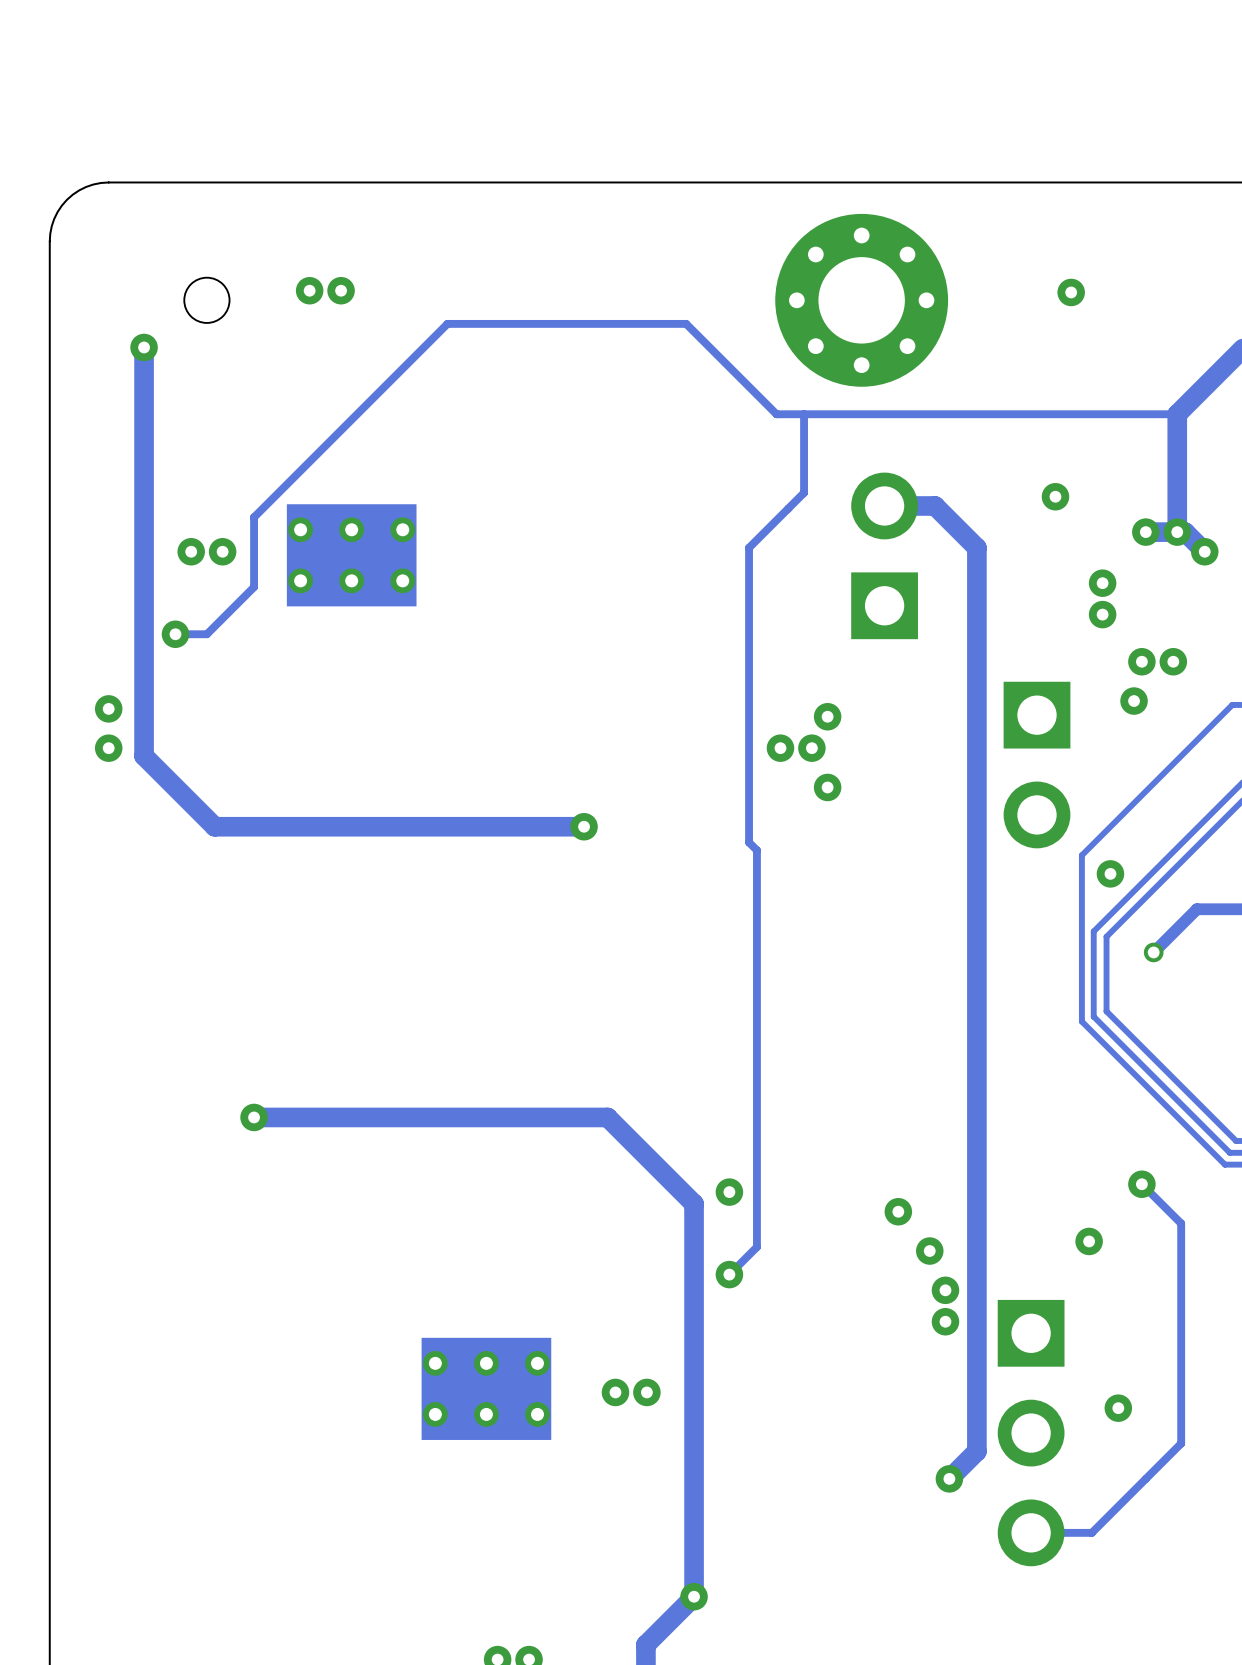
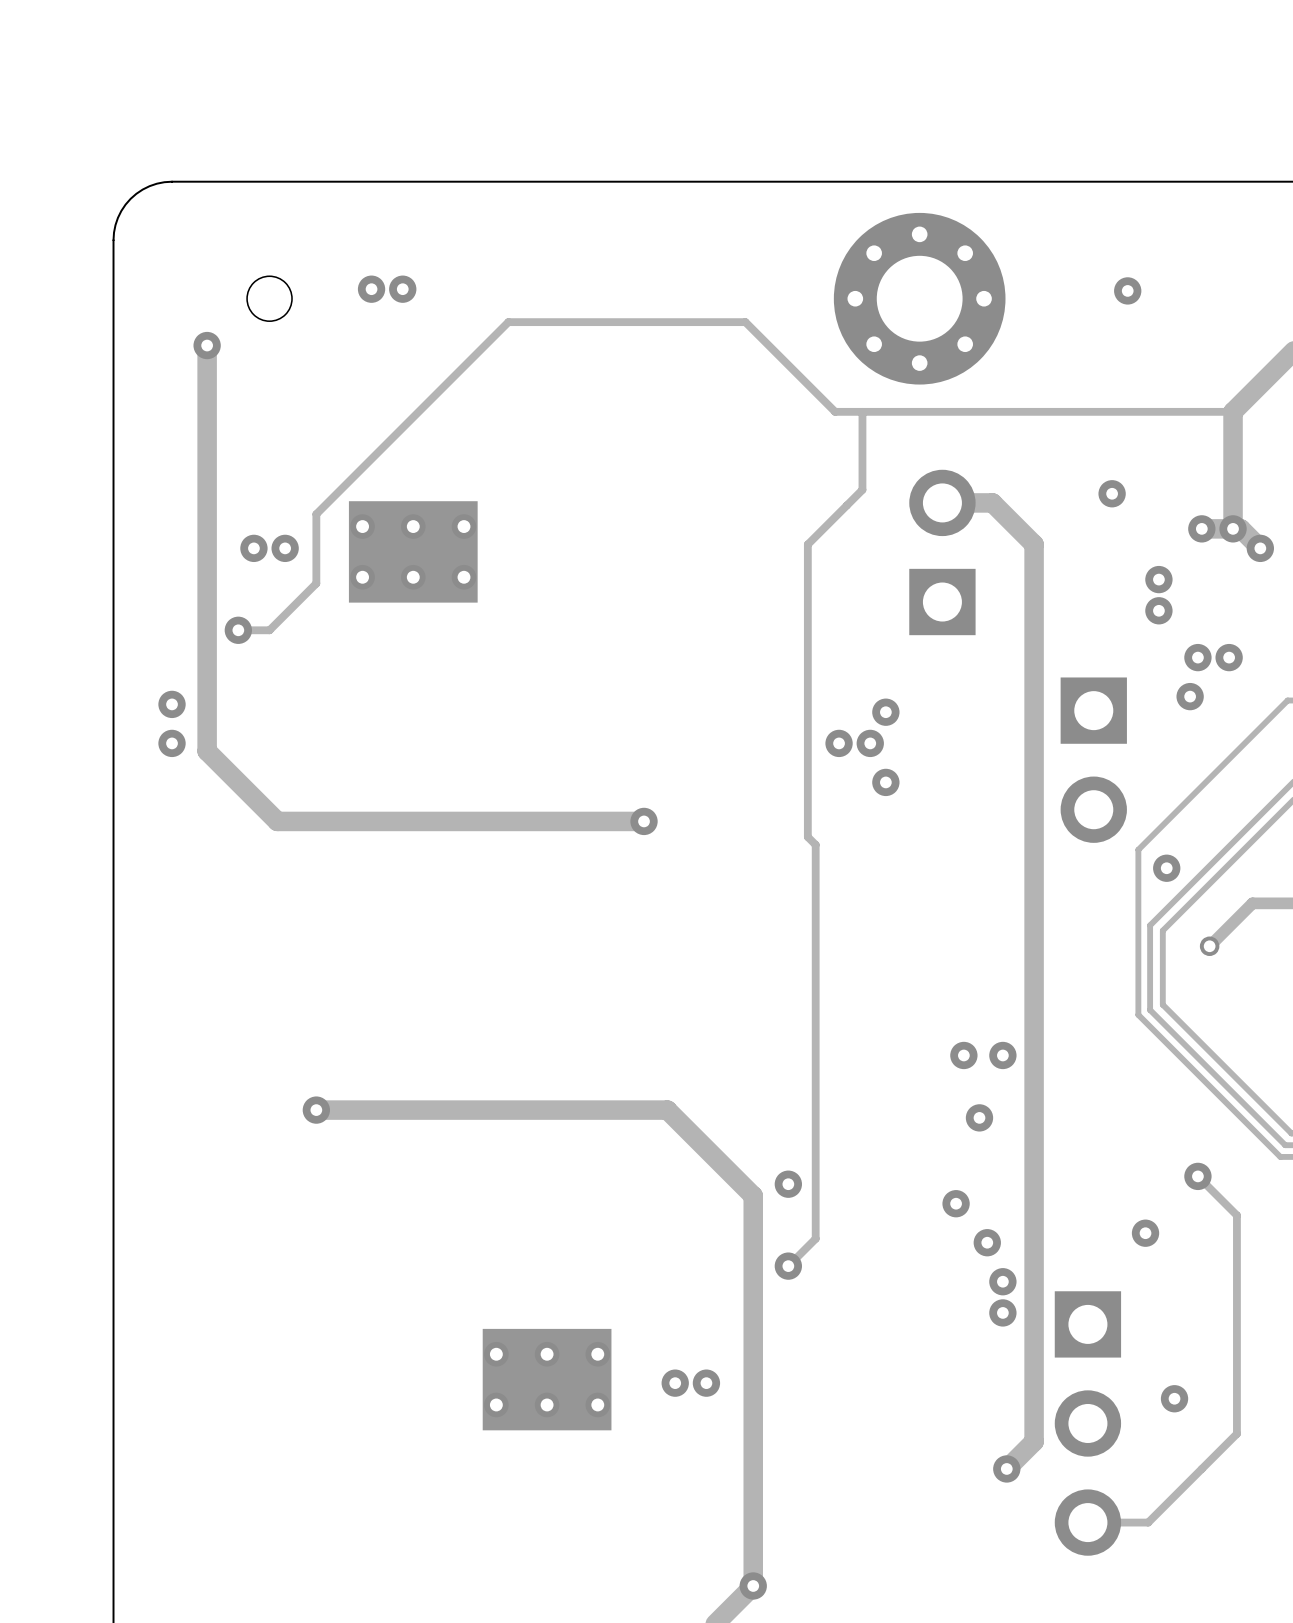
via: none -> (963, 1055)
via: none -> (1002, 1055)
via: none -> (979, 1117)

